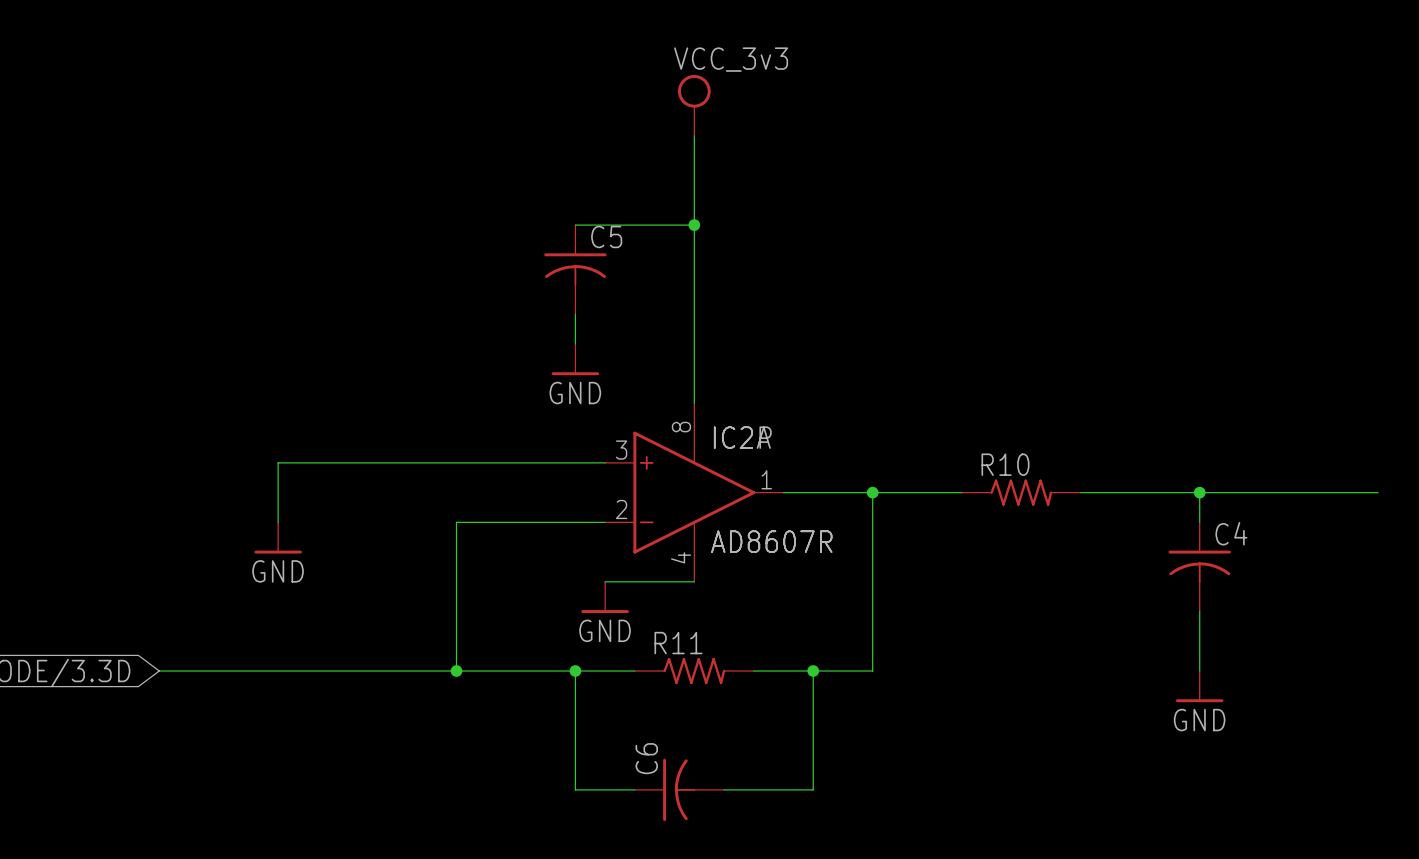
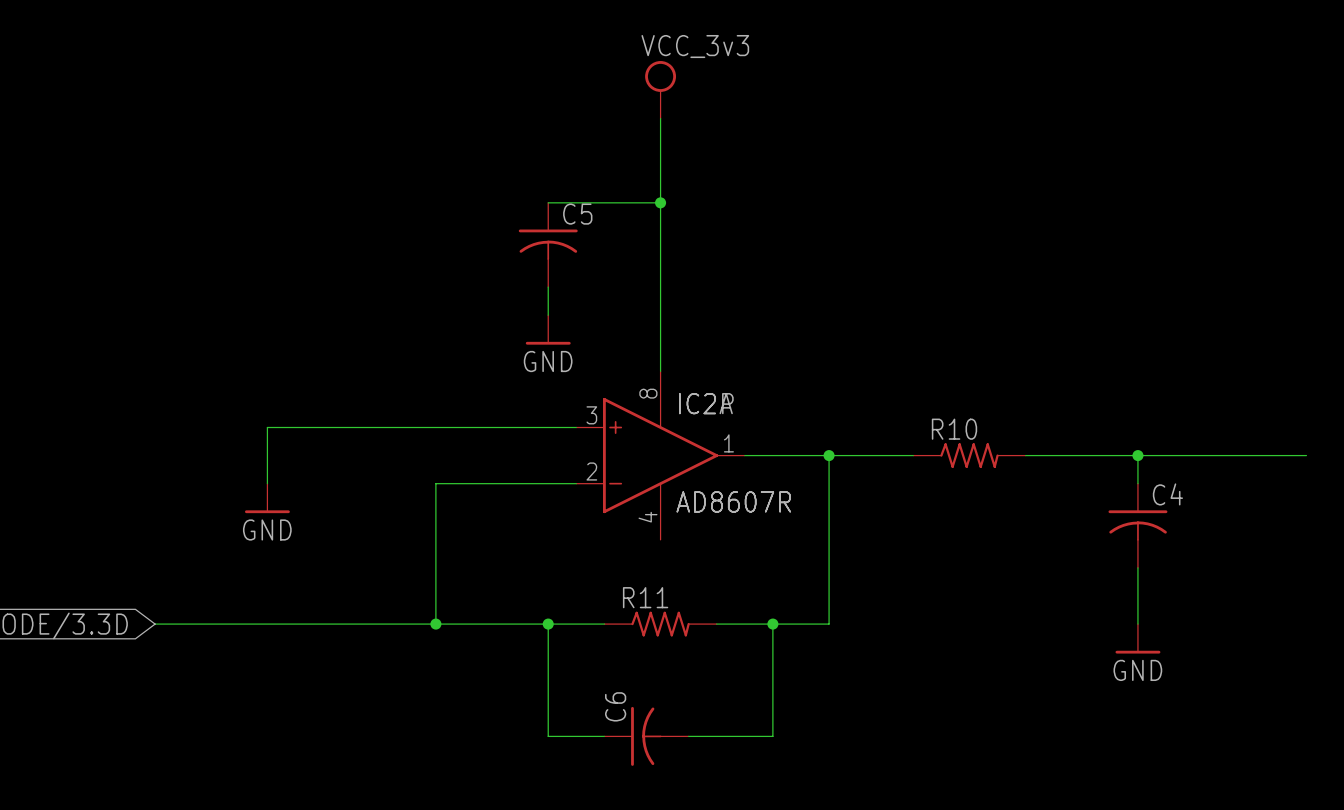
wire: (605, 581) (694, 581) -> none
power symbol: GND (605, 597) -> none

